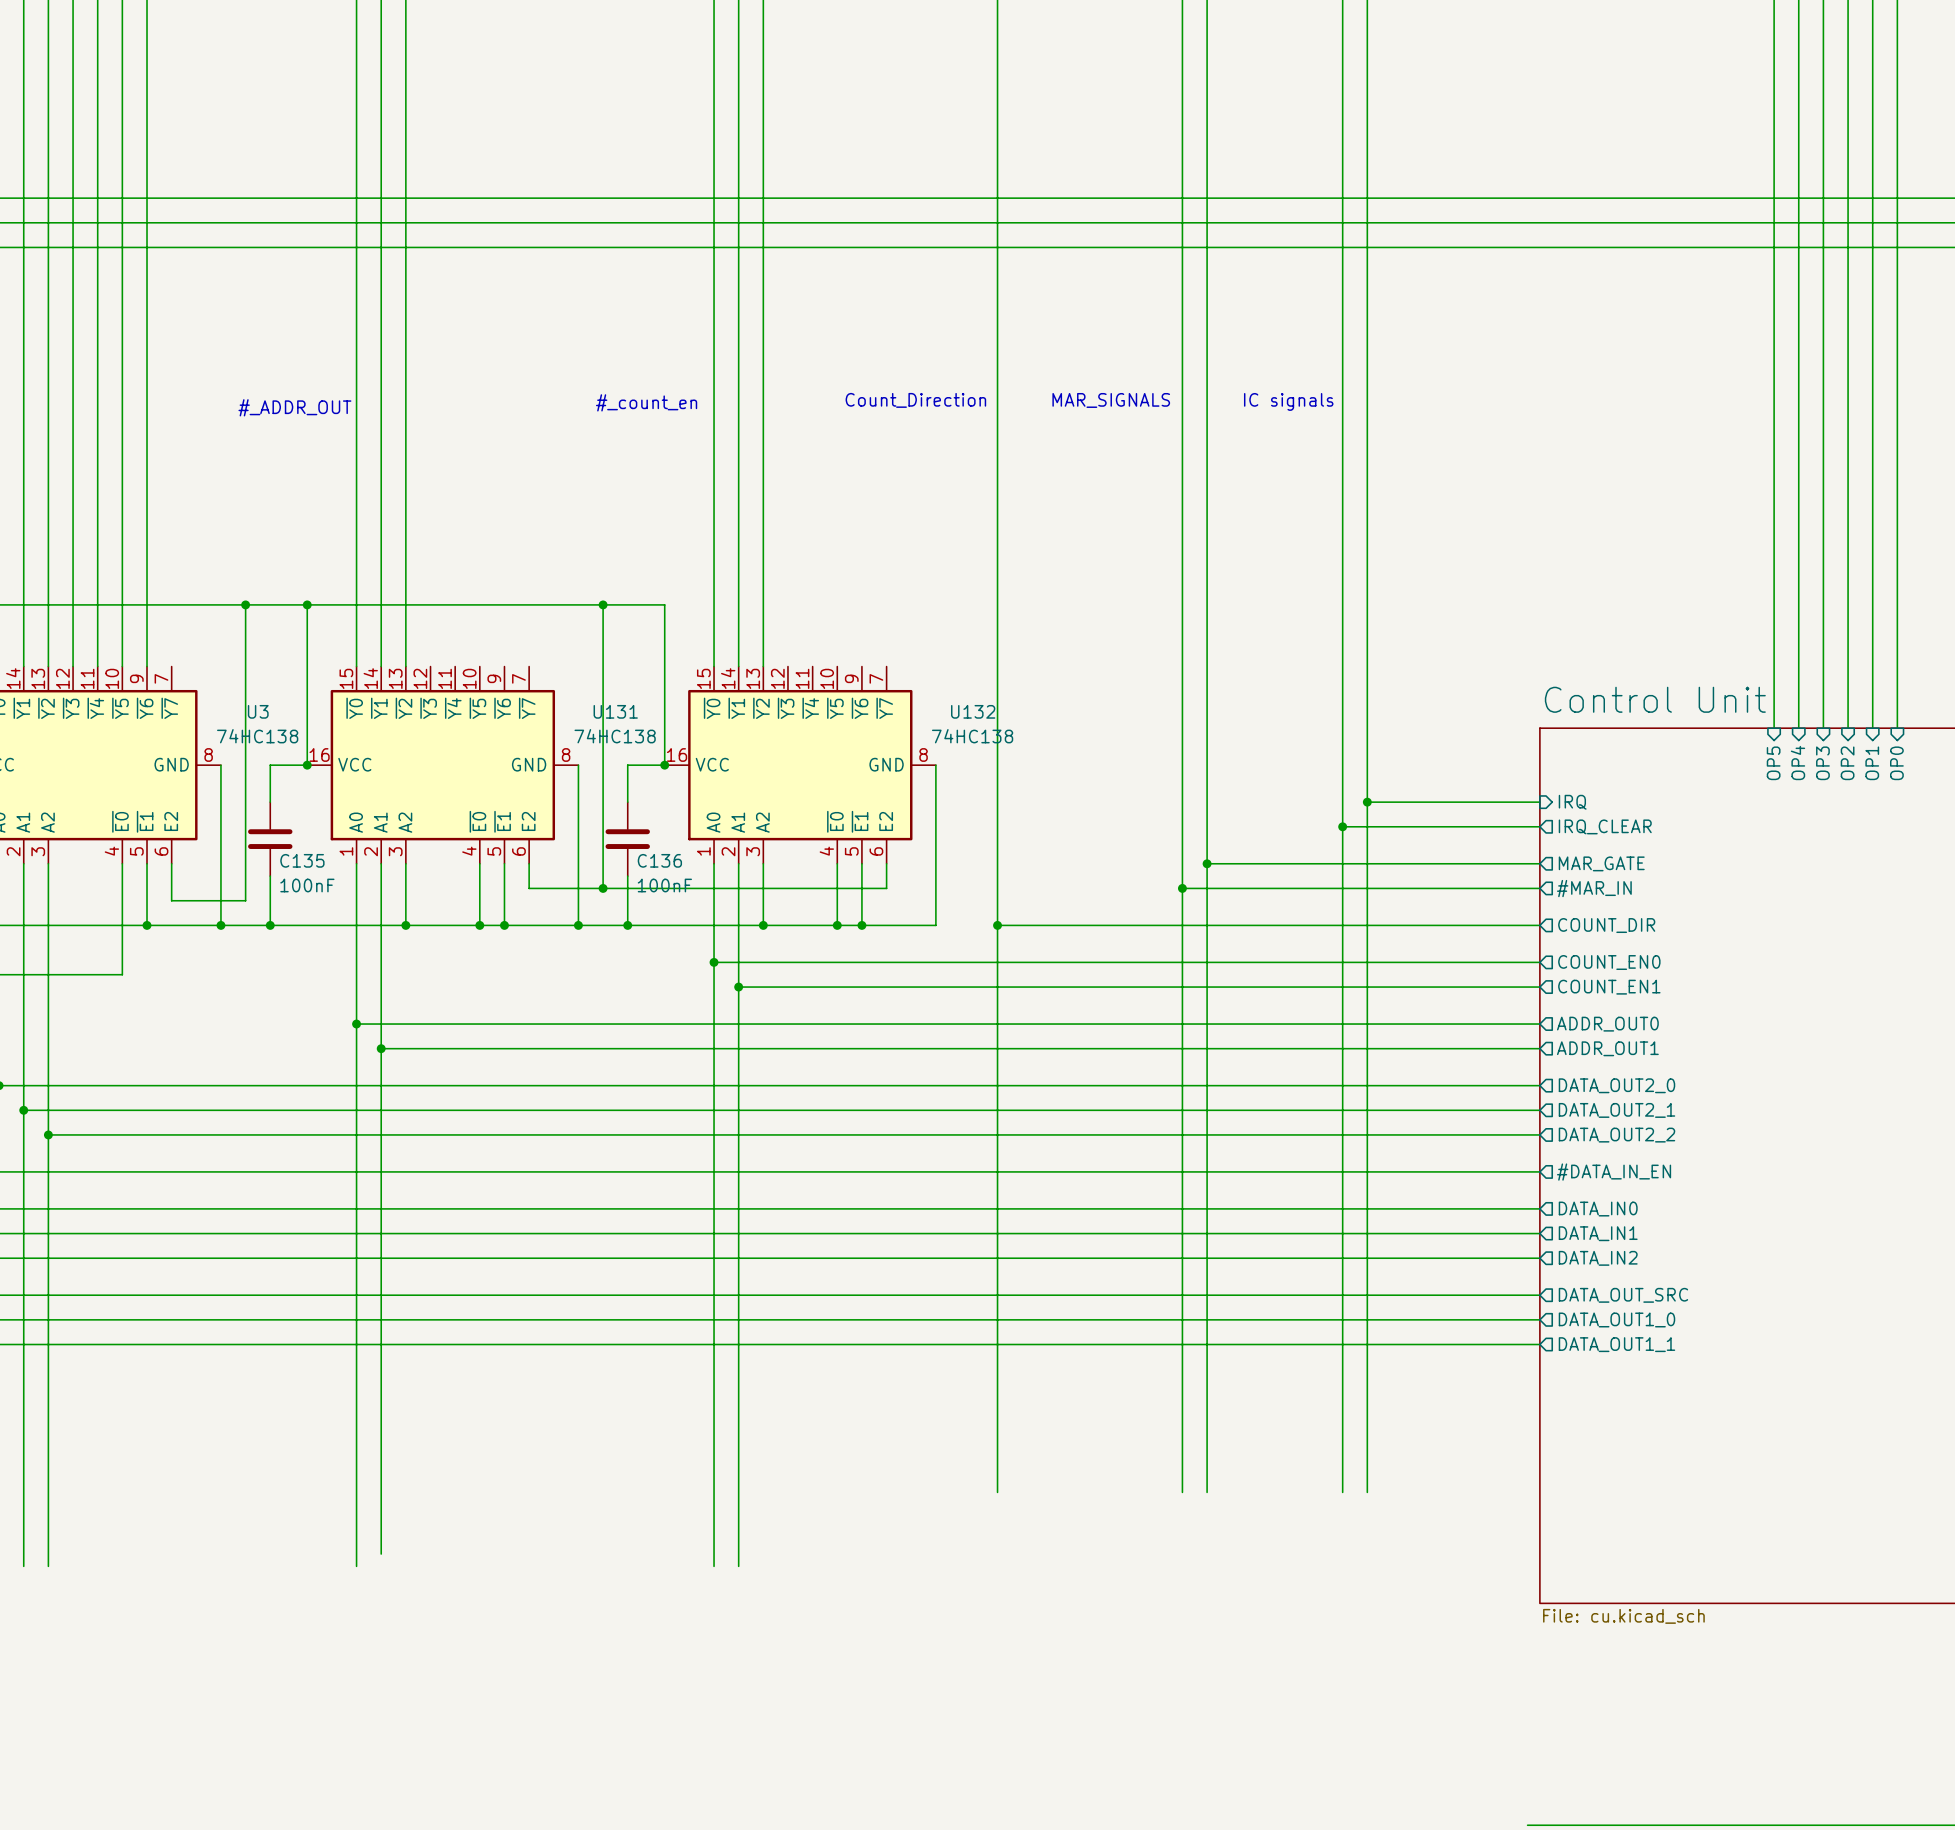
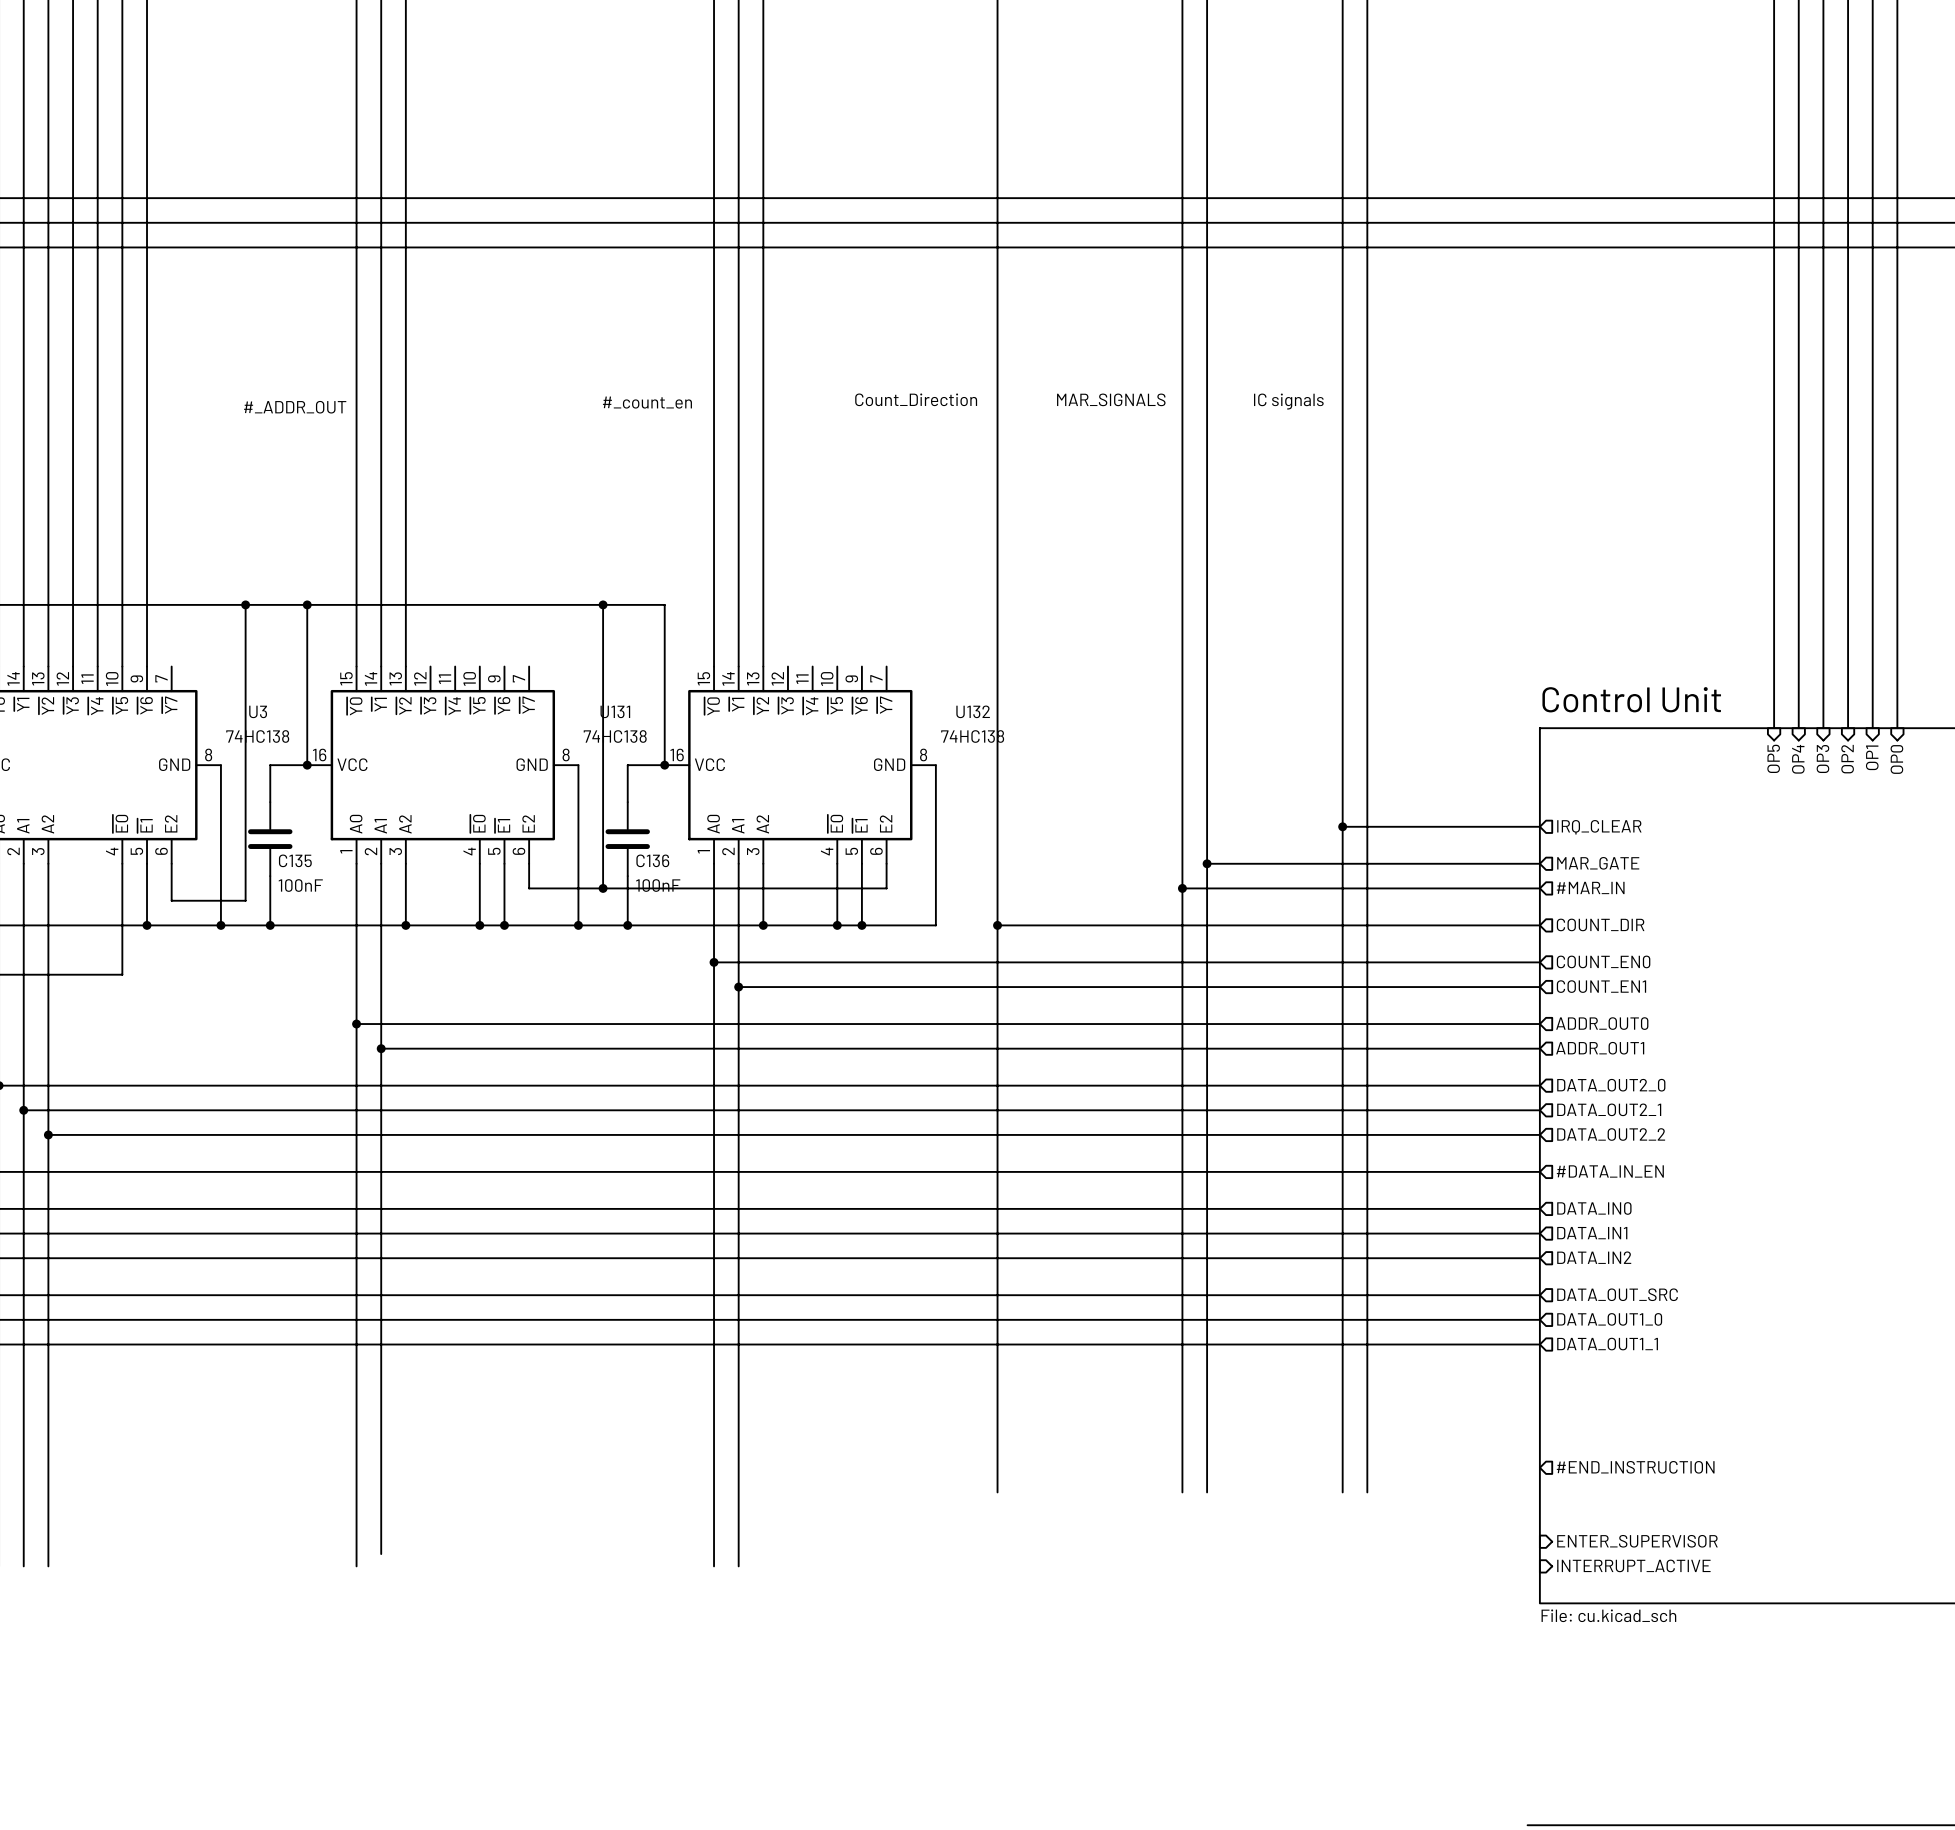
wire: (1367, 802) (1539, 802) -> none
junction: (1367, 802) -> none
sheet pin: IRQ (1572, 802) -> none
sheet pin: none -> #END_INSTRUCTION (1635, 1467)
sheet pin: none -> ENTER_SUPERVISOR (1637, 1541)
sheet pin: none -> INTERRUPT_ACTIVE (1633, 1565)

